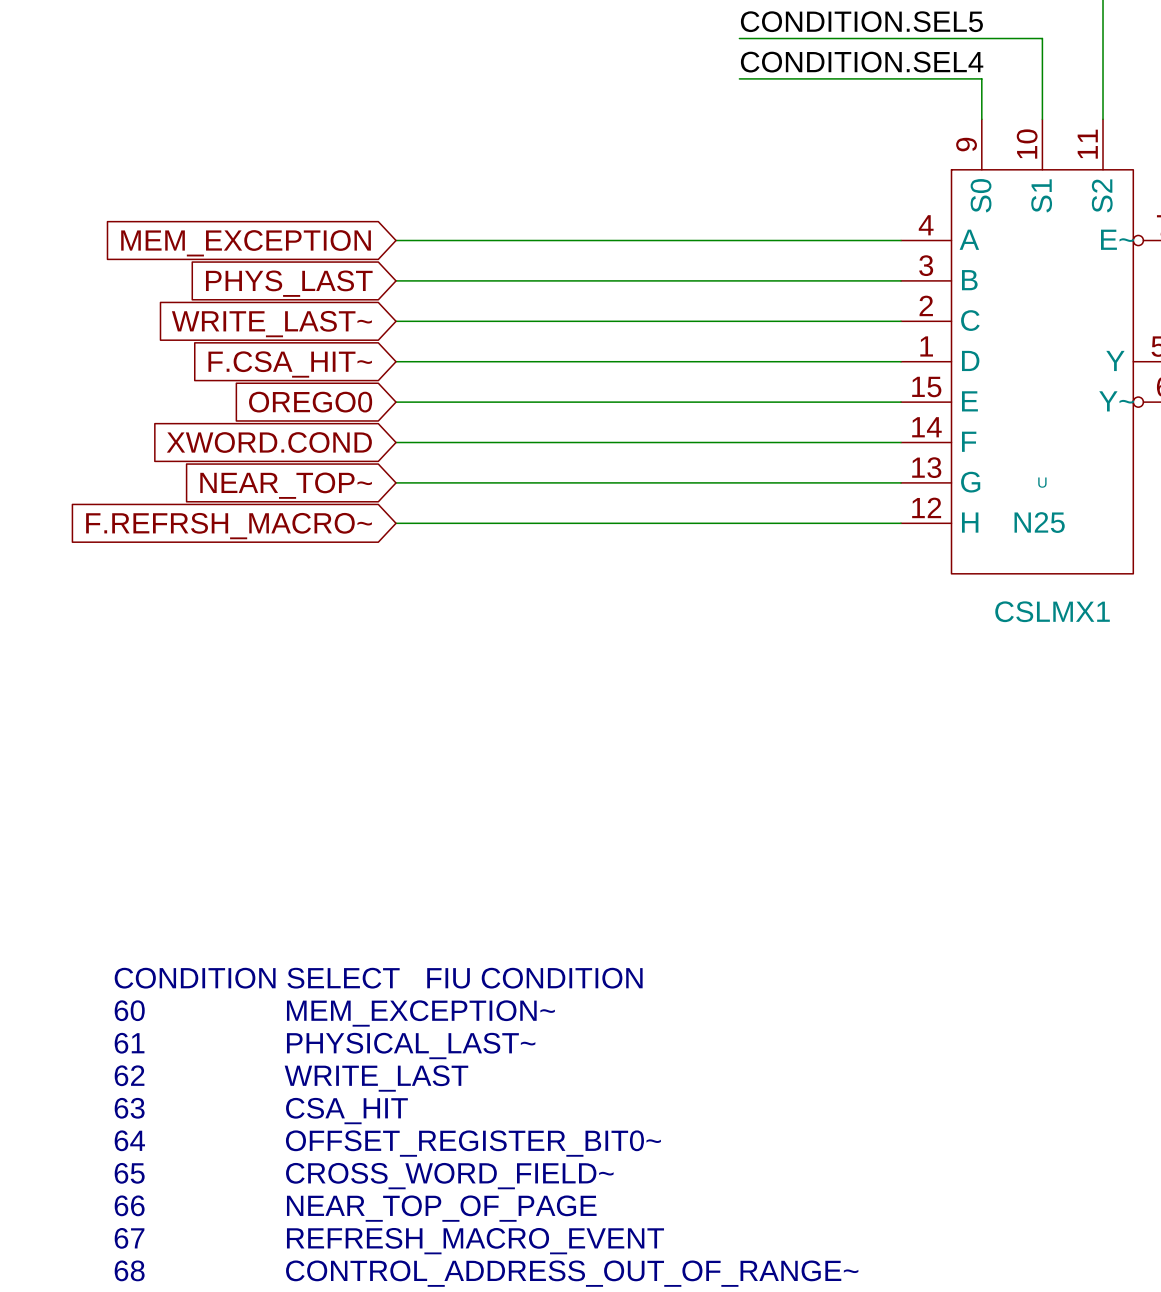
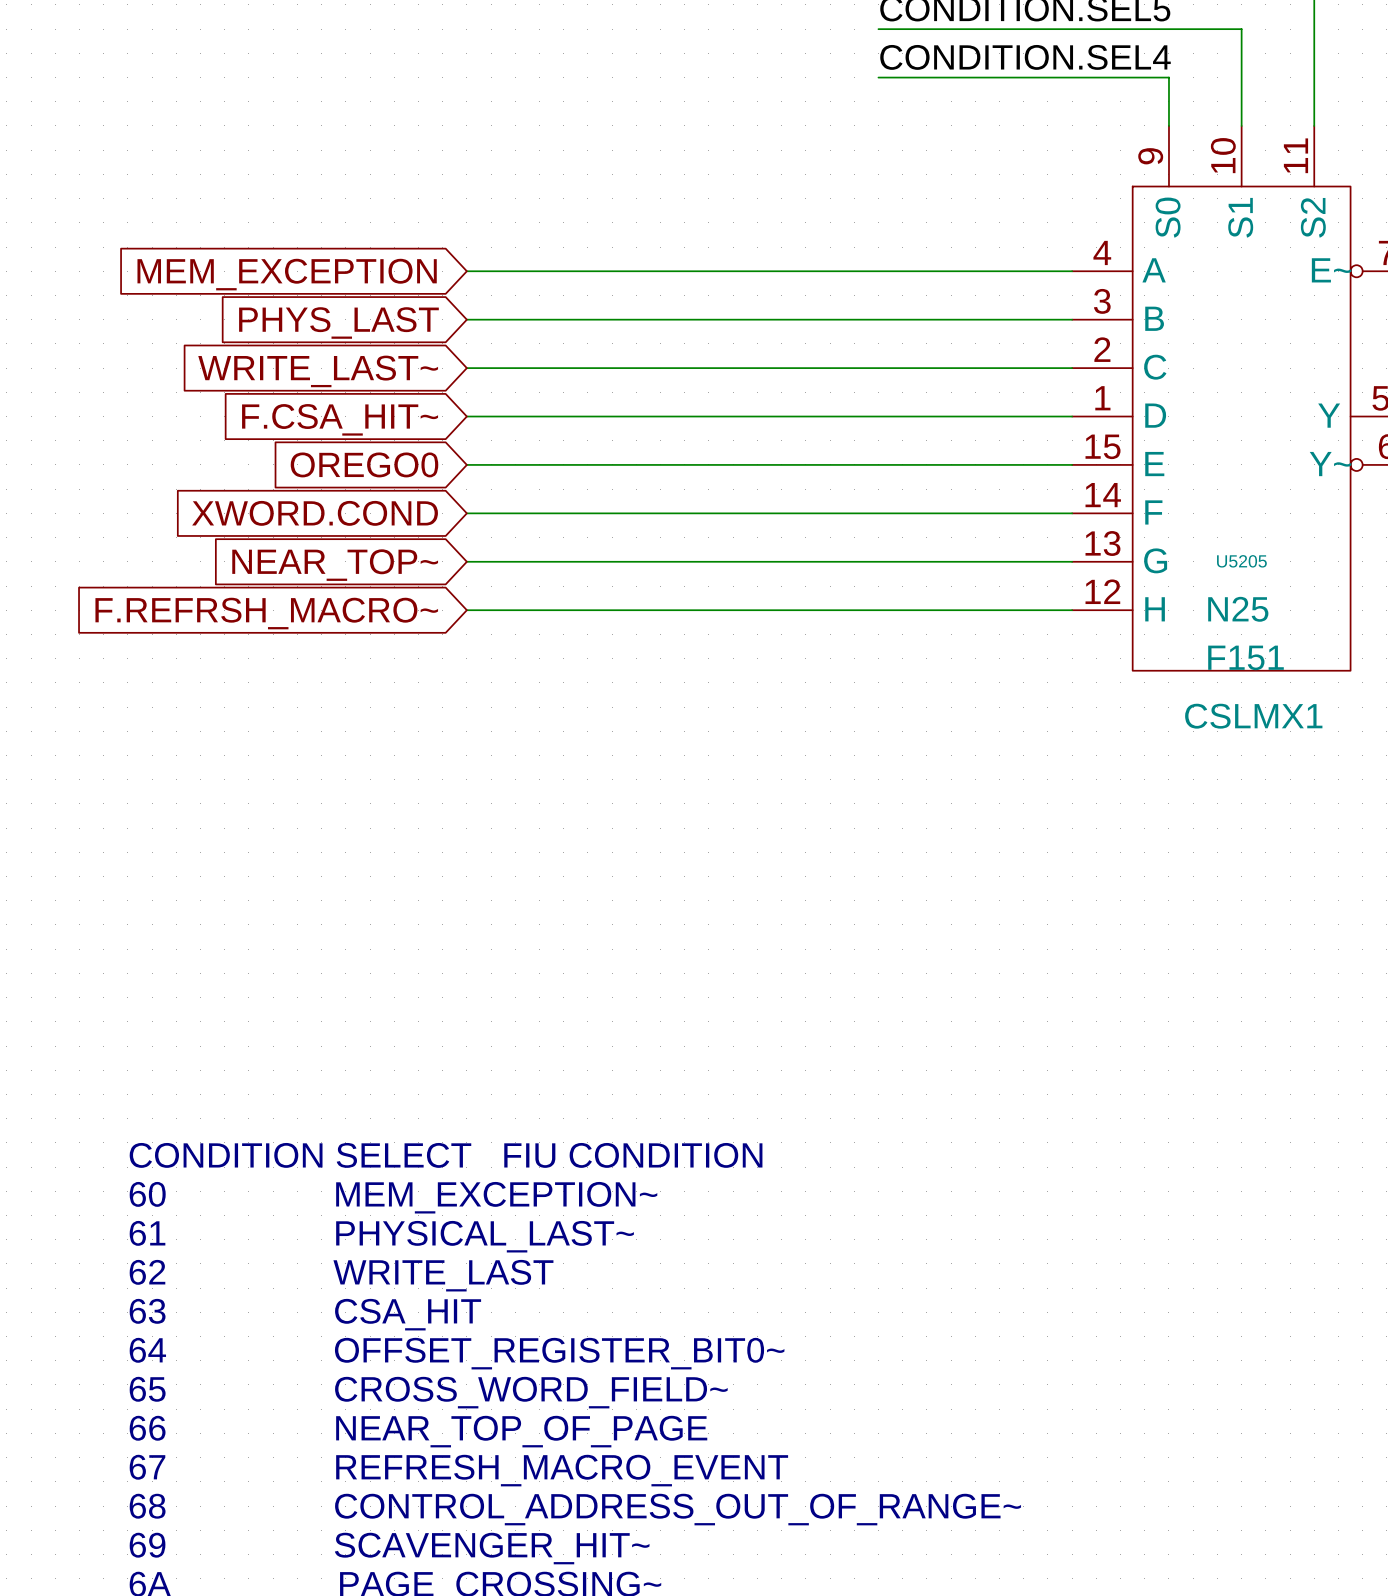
U name: U (1042, 482) -> U5205 (1241, 561)
U value: none -> F151 (1245, 657)

